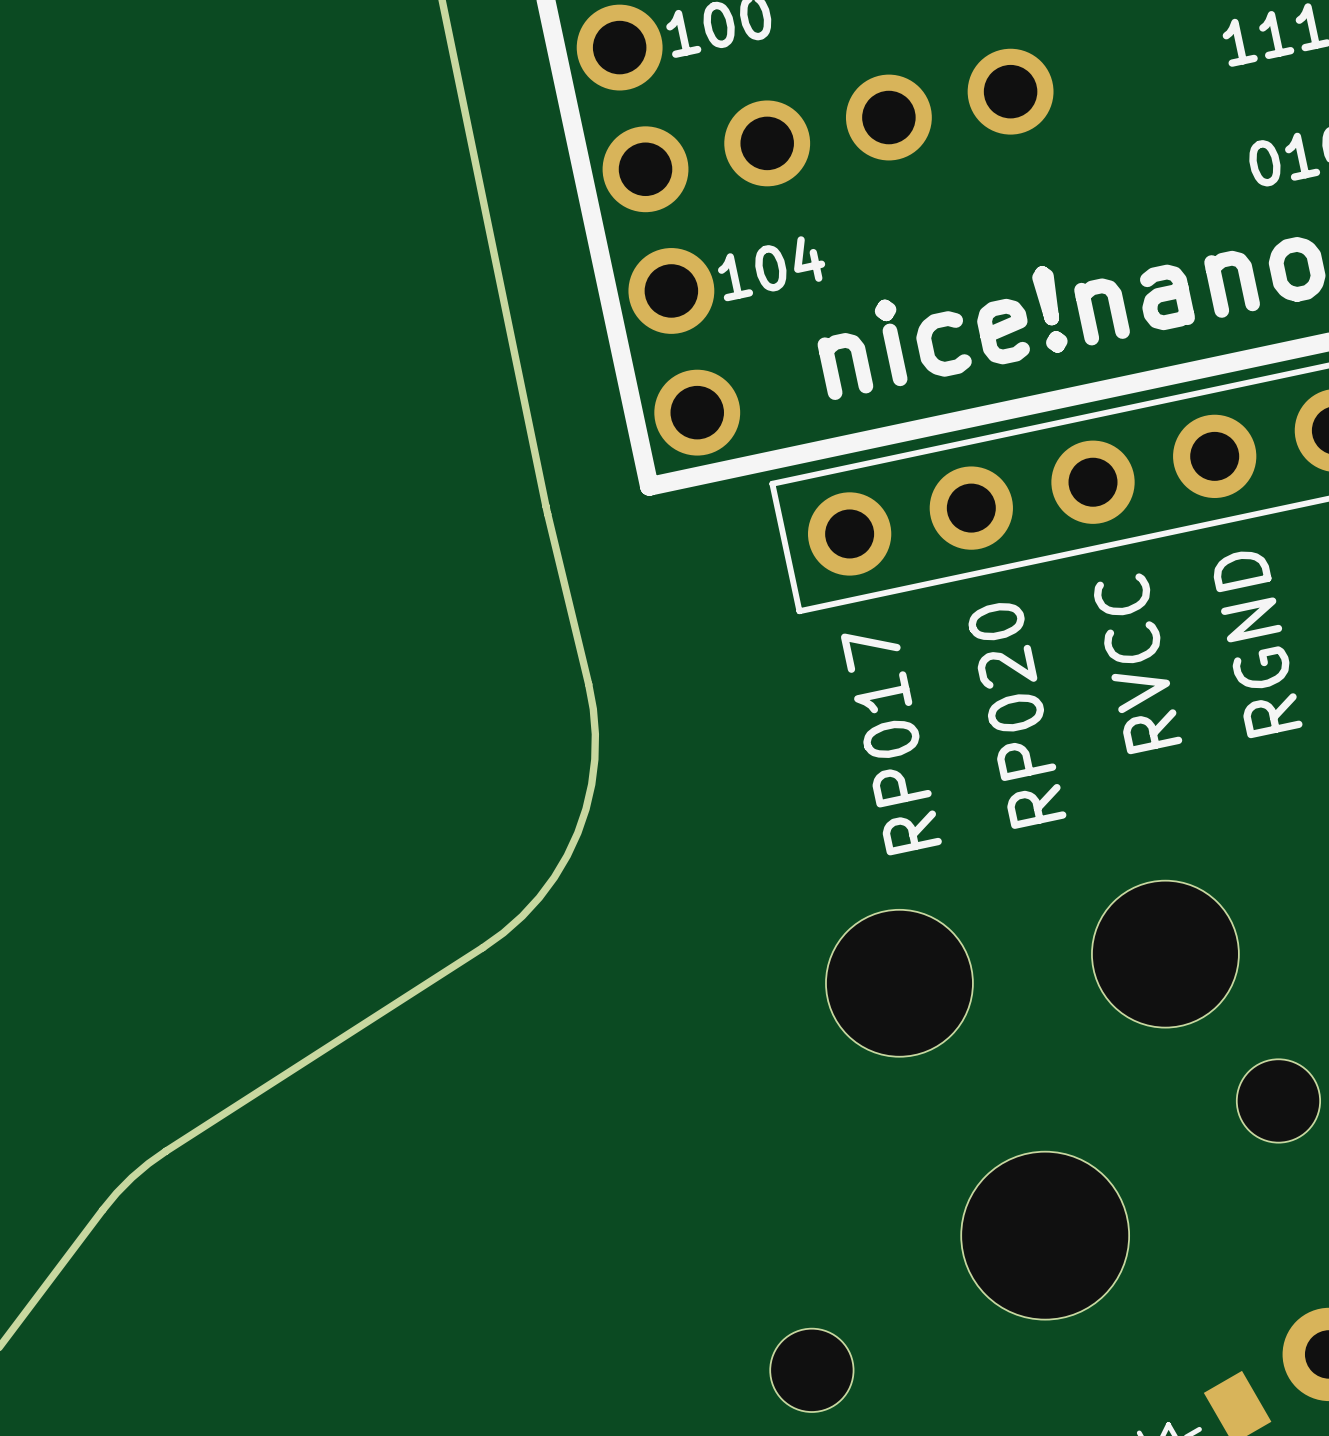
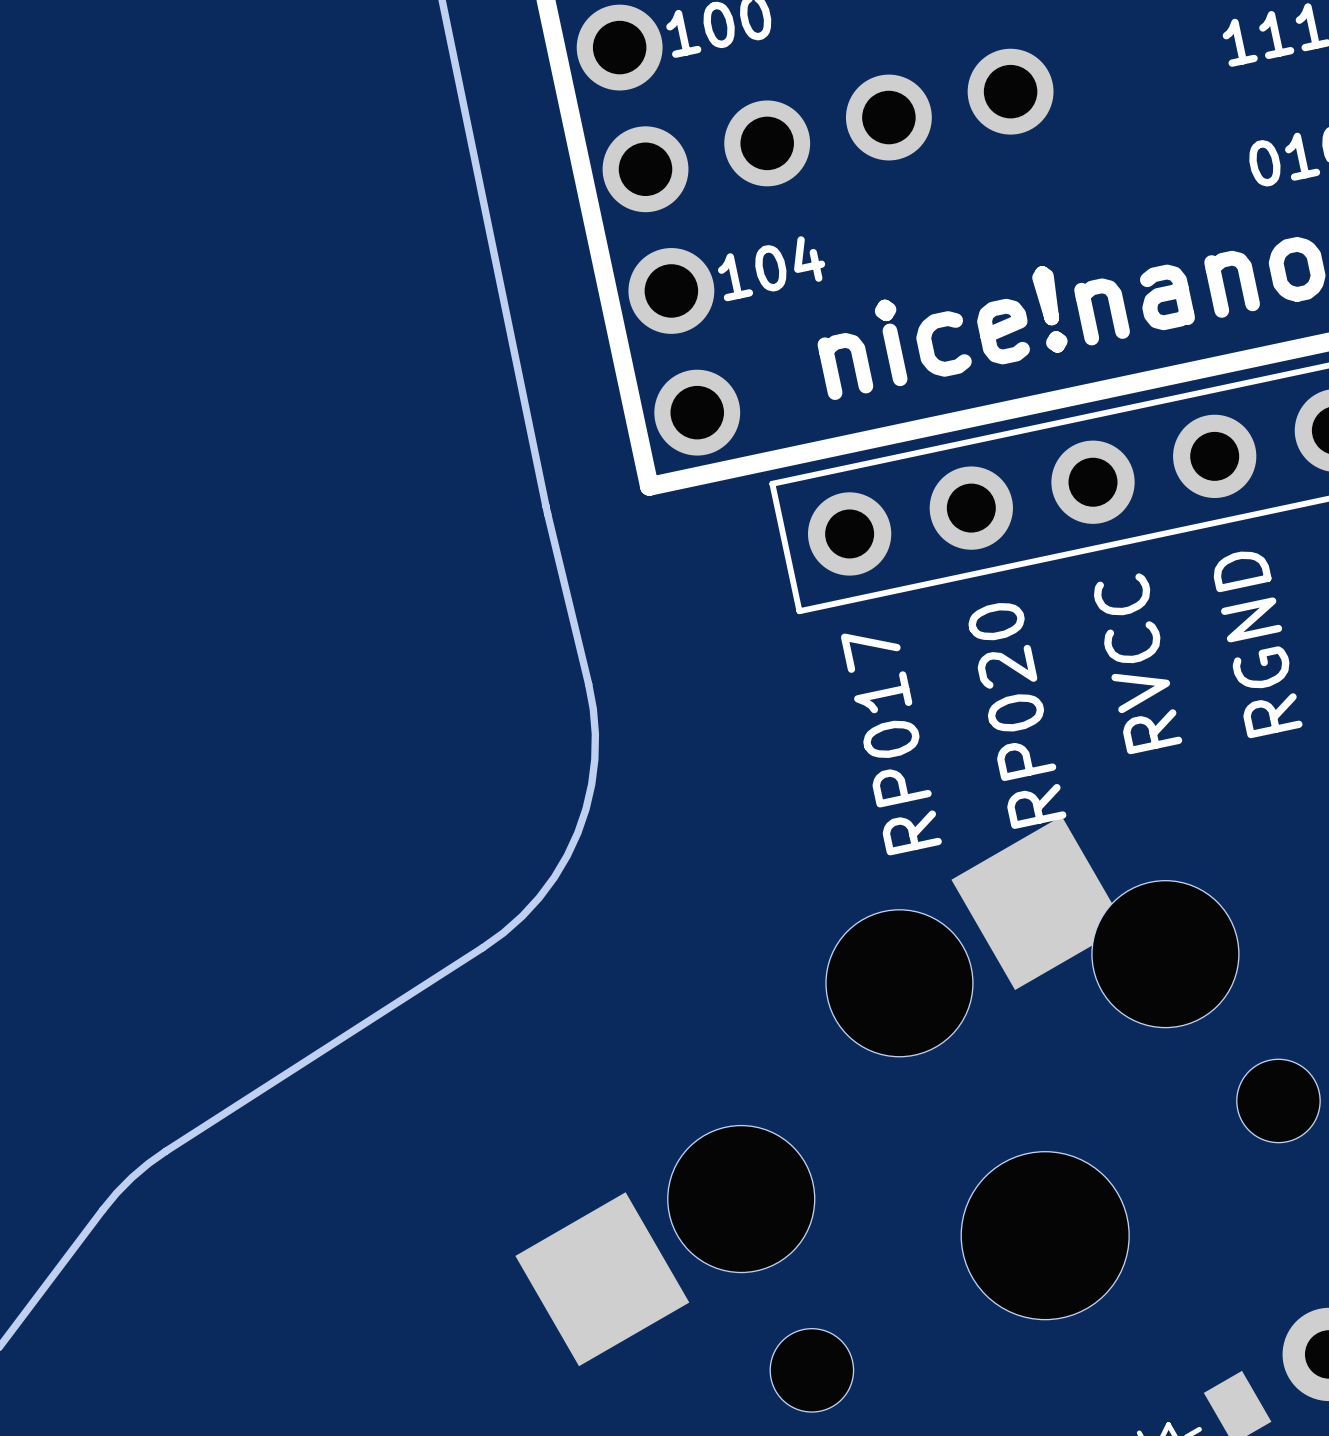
part: none -> (917, 1114)
part: (1045, 1146) -> none

